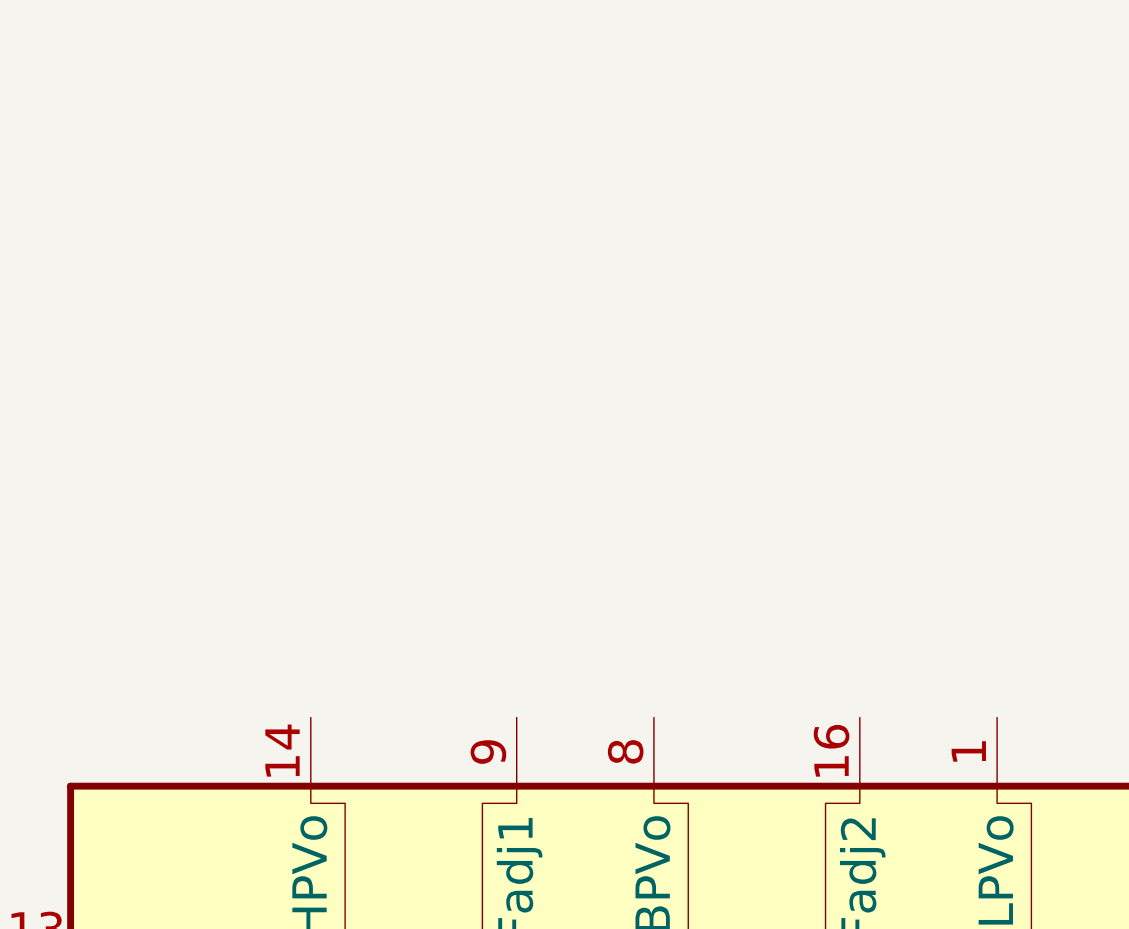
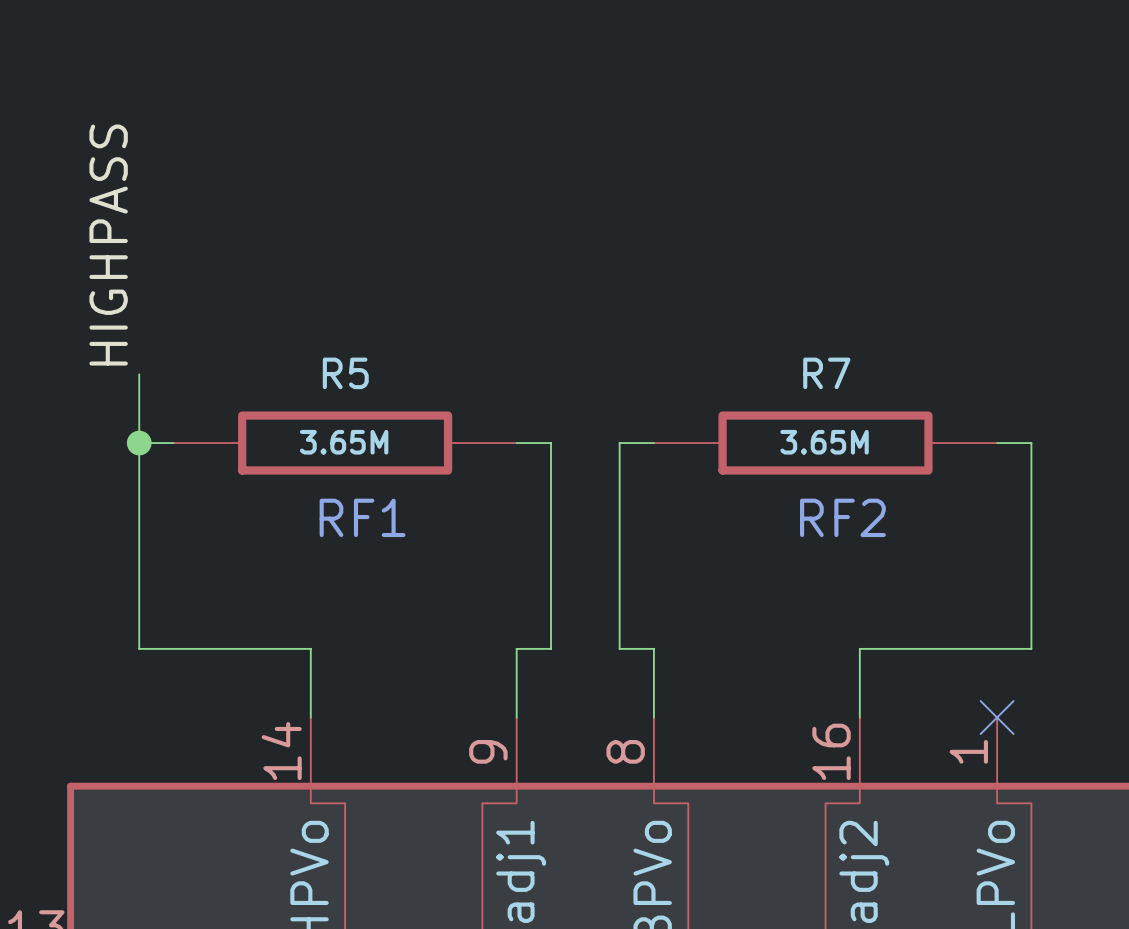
label: none -> HIGHPASS (108, 245)
wire: none -> (139, 374) (139, 648) (310, 648) (310, 717)
wire: none -> (139, 443) (173, 443)
junction: none -> (139, 443)
R5: none -> 3.65M (345, 443)
wire: none -> (516, 443) (551, 443) (551, 648) (516, 648) (516, 717)
wire: none -> (653, 443) (619, 443) (619, 648) (653, 648) (653, 717)
R7: none -> 3.65M (825, 443)
wire: none -> (997, 443) (1031, 443) (1031, 648) (859, 648) (859, 717)
text: none -> RF1 (362, 517)
text: none -> RF2 (842, 517)
no-connect mark: none -> (997, 717)

